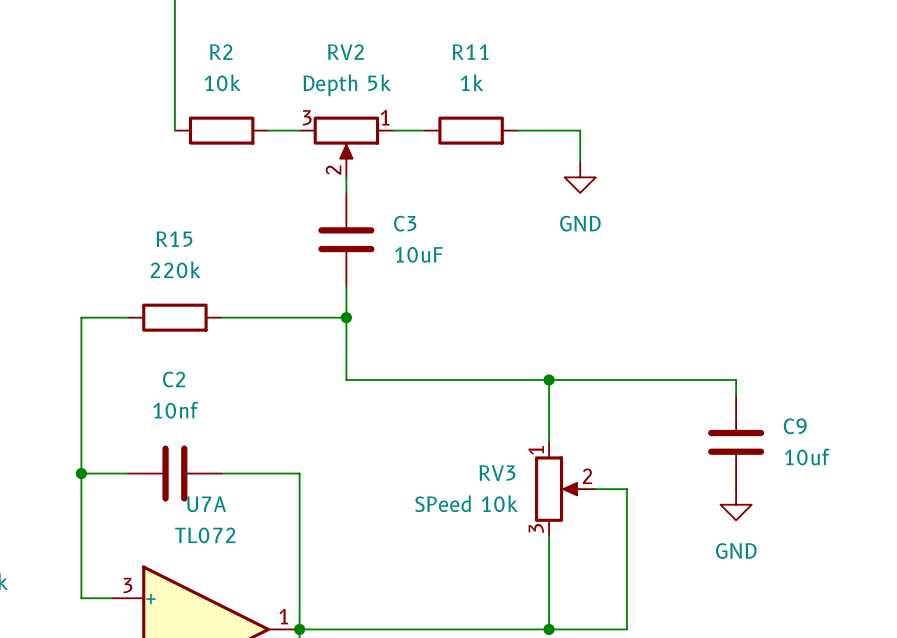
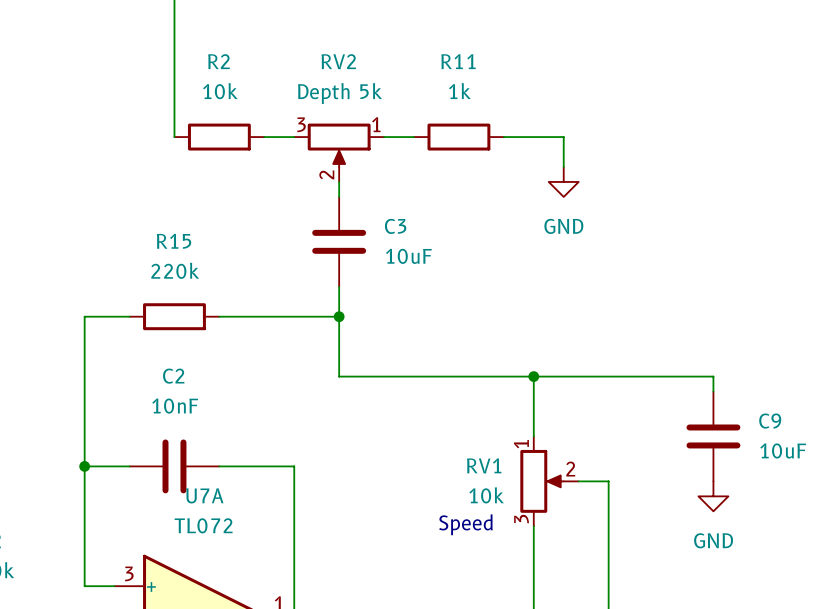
C2 value: 10nf (175, 410) -> 10nF (175, 406)
C9 value: 10uf (807, 456) -> 10uF (783, 450)
RV3 name: RV3 (497, 473) -> RV1 (484, 465)
RV3 value: SPeed 10k (466, 503) -> 10k (486, 495)
text: none -> Speed (465, 524)

